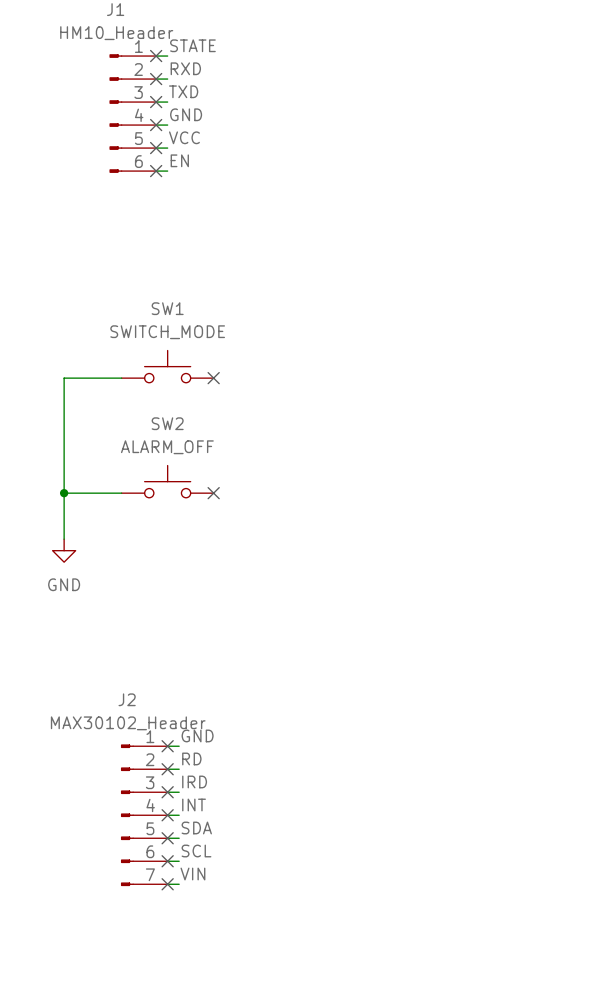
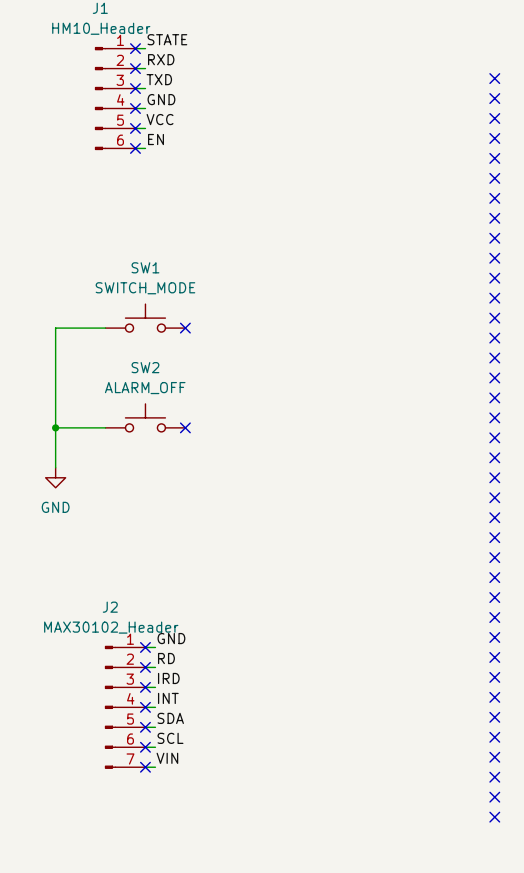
no-connect mark: none -> (494, 78)
no-connect mark: none -> (494, 98)
no-connect mark: none -> (494, 118)
no-connect mark: none -> (494, 138)
no-connect mark: none -> (494, 158)
no-connect mark: none -> (494, 178)
no-connect mark: none -> (494, 198)
no-connect mark: none -> (494, 218)
no-connect mark: none -> (494, 238)
no-connect mark: none -> (494, 258)
no-connect mark: none -> (494, 278)
no-connect mark: none -> (494, 298)
no-connect mark: none -> (494, 318)
no-connect mark: none -> (494, 338)
no-connect mark: none -> (494, 358)
no-connect mark: none -> (494, 377)
no-connect mark: none -> (494, 397)
no-connect mark: none -> (494, 417)
no-connect mark: none -> (494, 437)
no-connect mark: none -> (494, 457)
no-connect mark: none -> (494, 477)
no-connect mark: none -> (494, 497)
no-connect mark: none -> (494, 517)
no-connect mark: none -> (494, 537)
no-connect mark: none -> (494, 557)
no-connect mark: none -> (494, 577)
no-connect mark: none -> (494, 597)
no-connect mark: none -> (494, 617)
no-connect mark: none -> (494, 637)
no-connect mark: none -> (494, 657)
no-connect mark: none -> (494, 677)
no-connect mark: none -> (494, 697)
no-connect mark: none -> (494, 717)
no-connect mark: none -> (494, 737)
no-connect mark: none -> (494, 757)
no-connect mark: none -> (494, 777)
no-connect mark: none -> (494, 797)
no-connect mark: none -> (494, 817)

